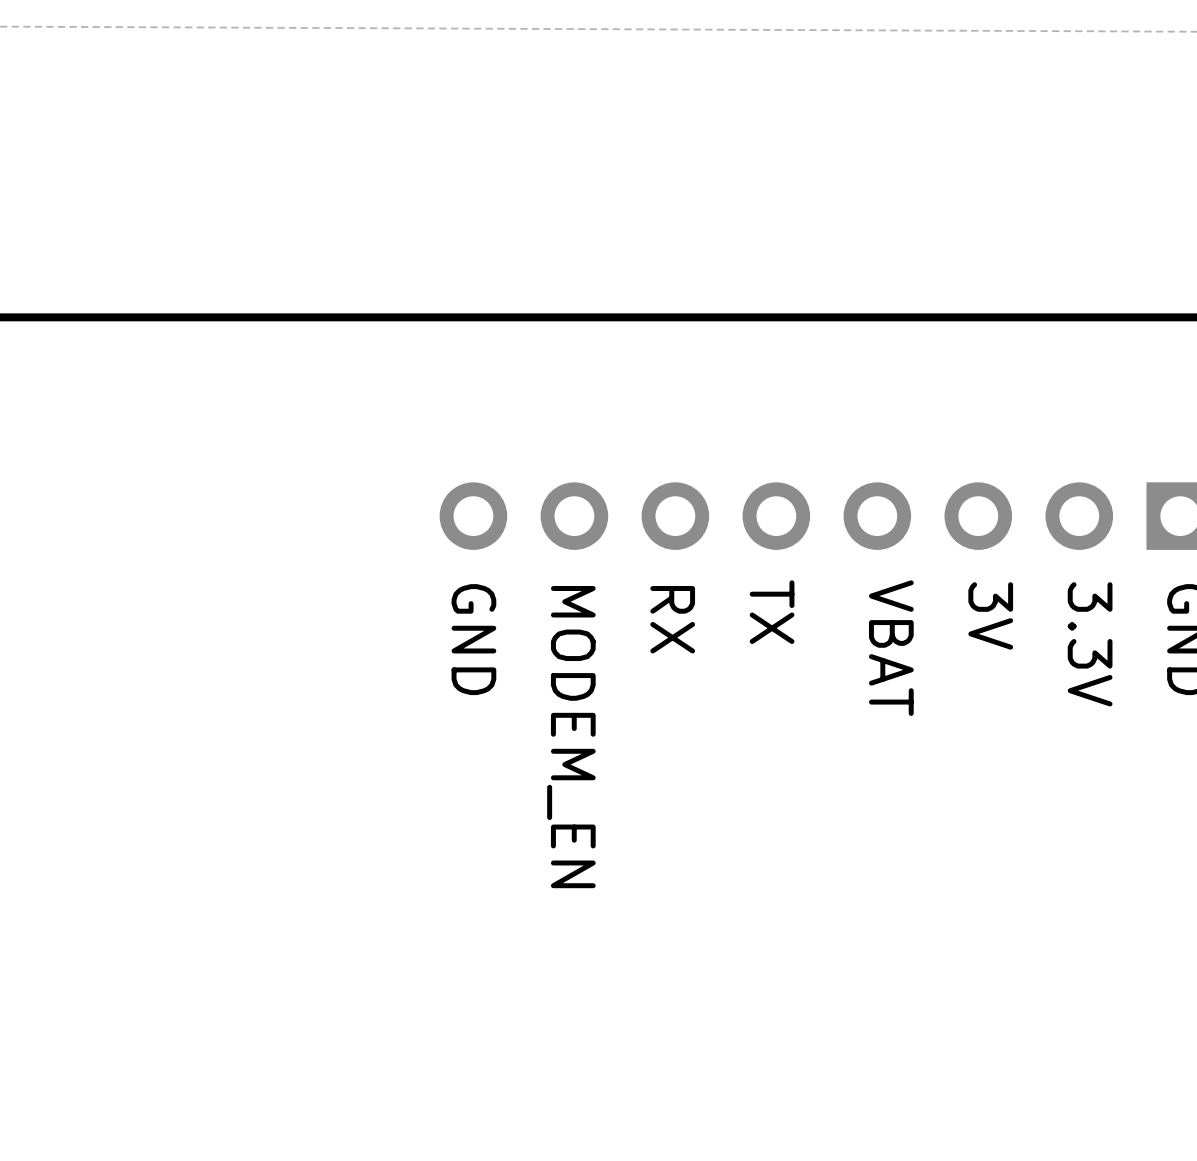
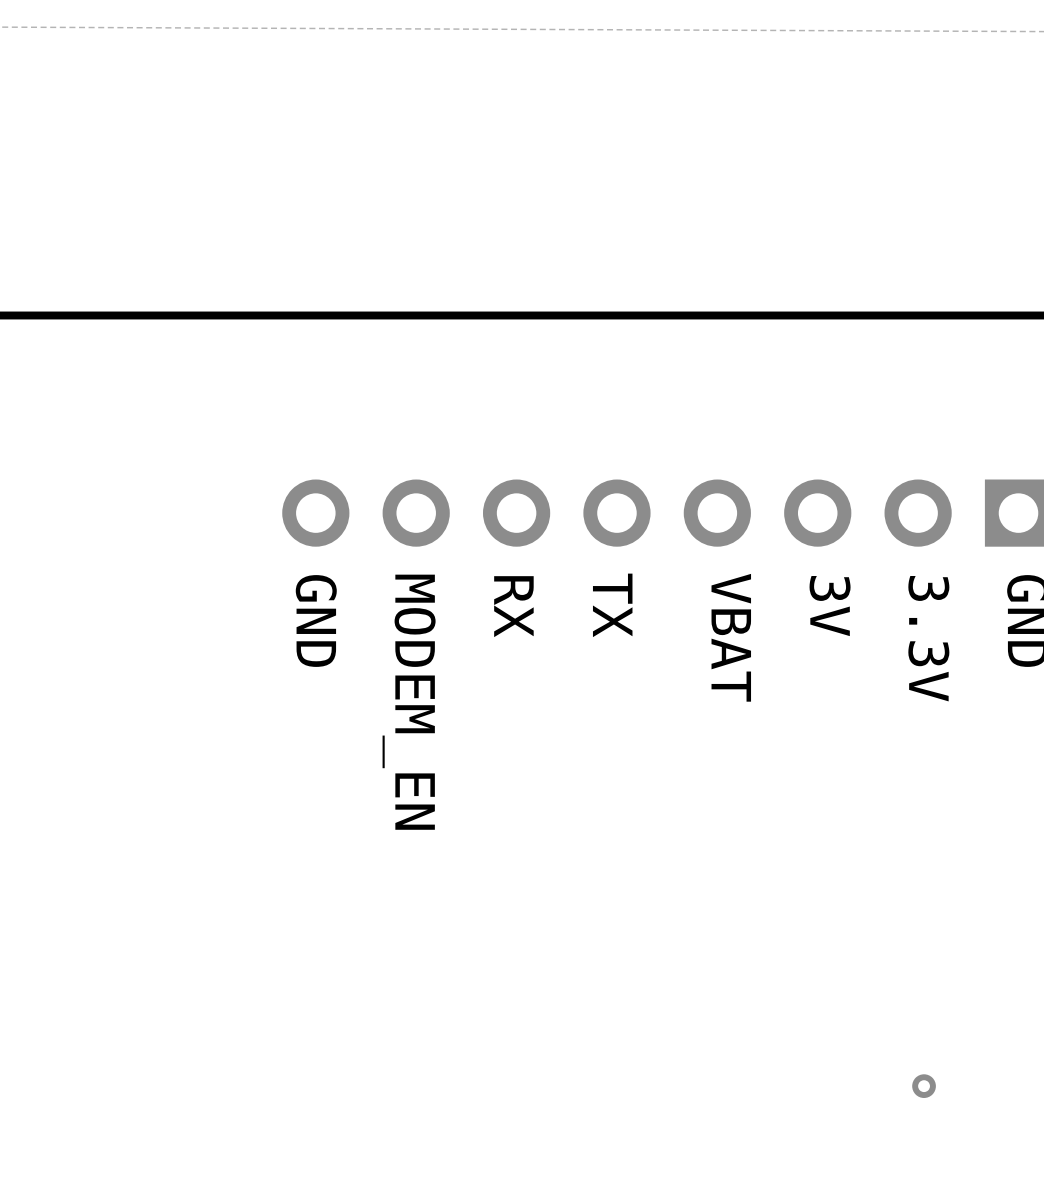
via: none -> (924, 1086)

